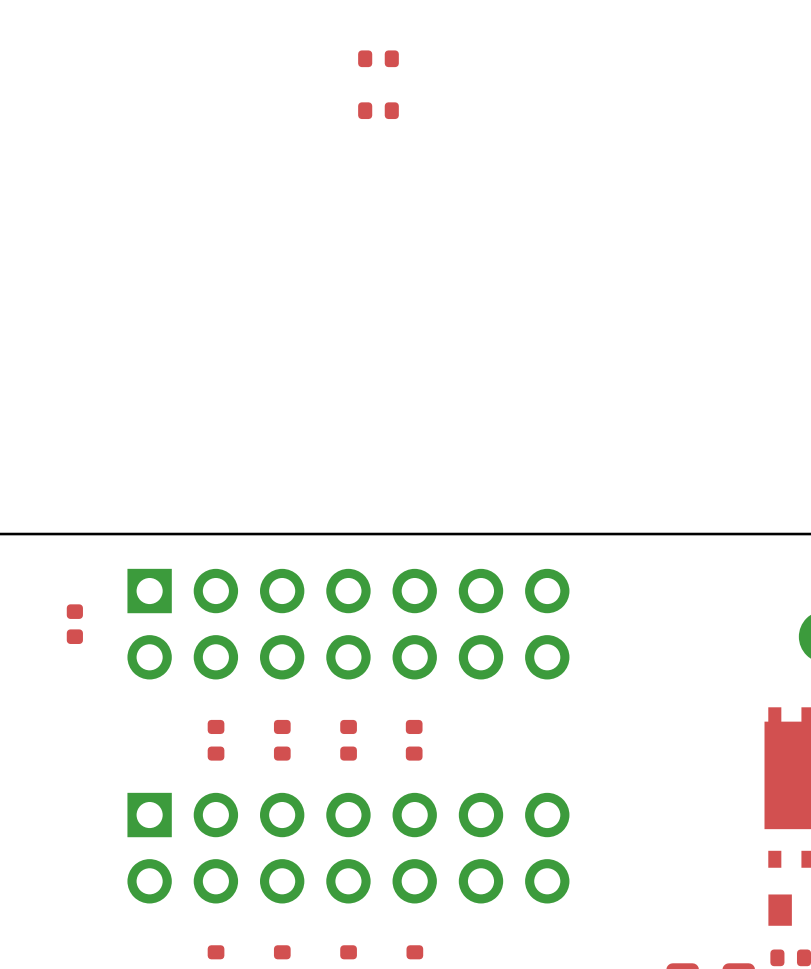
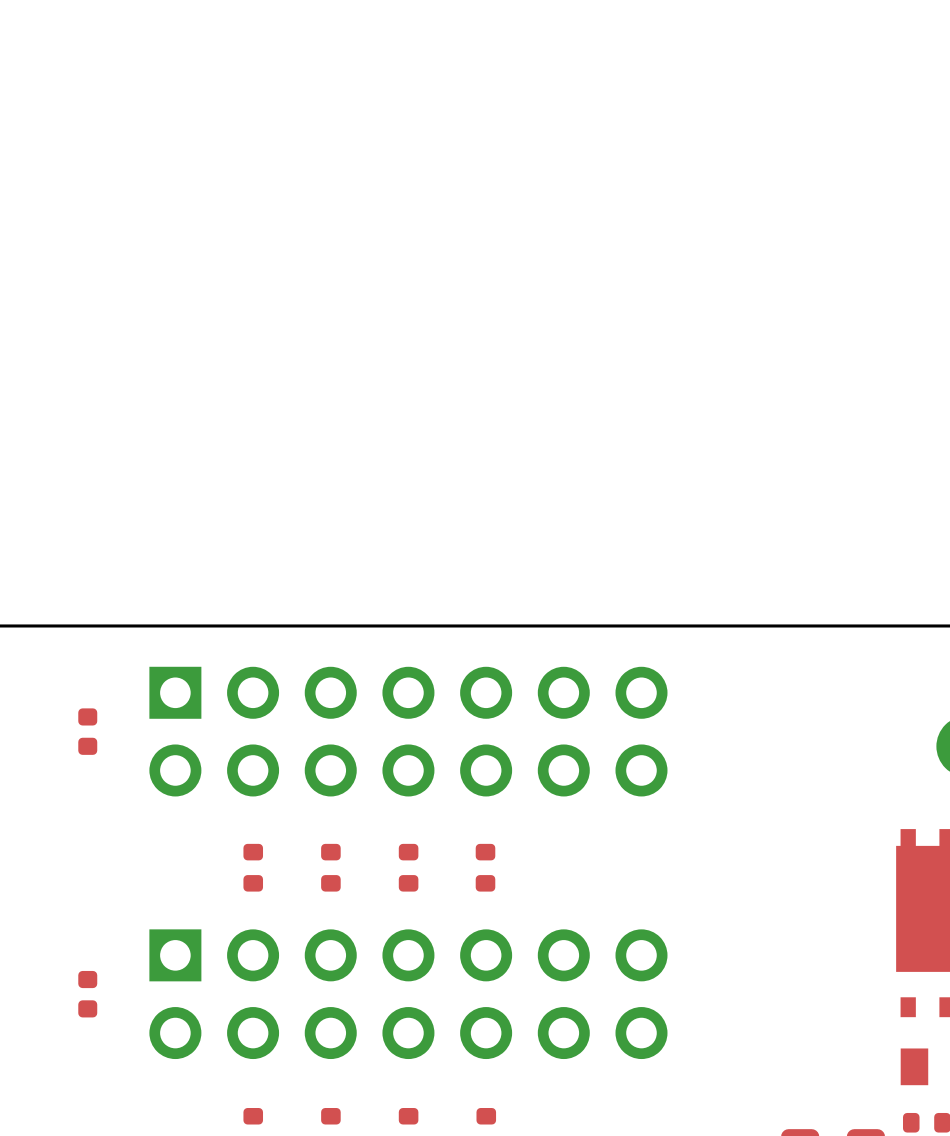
part: (378, 58) -> none
part: (378, 110) -> none
part: none -> (87, 994)

